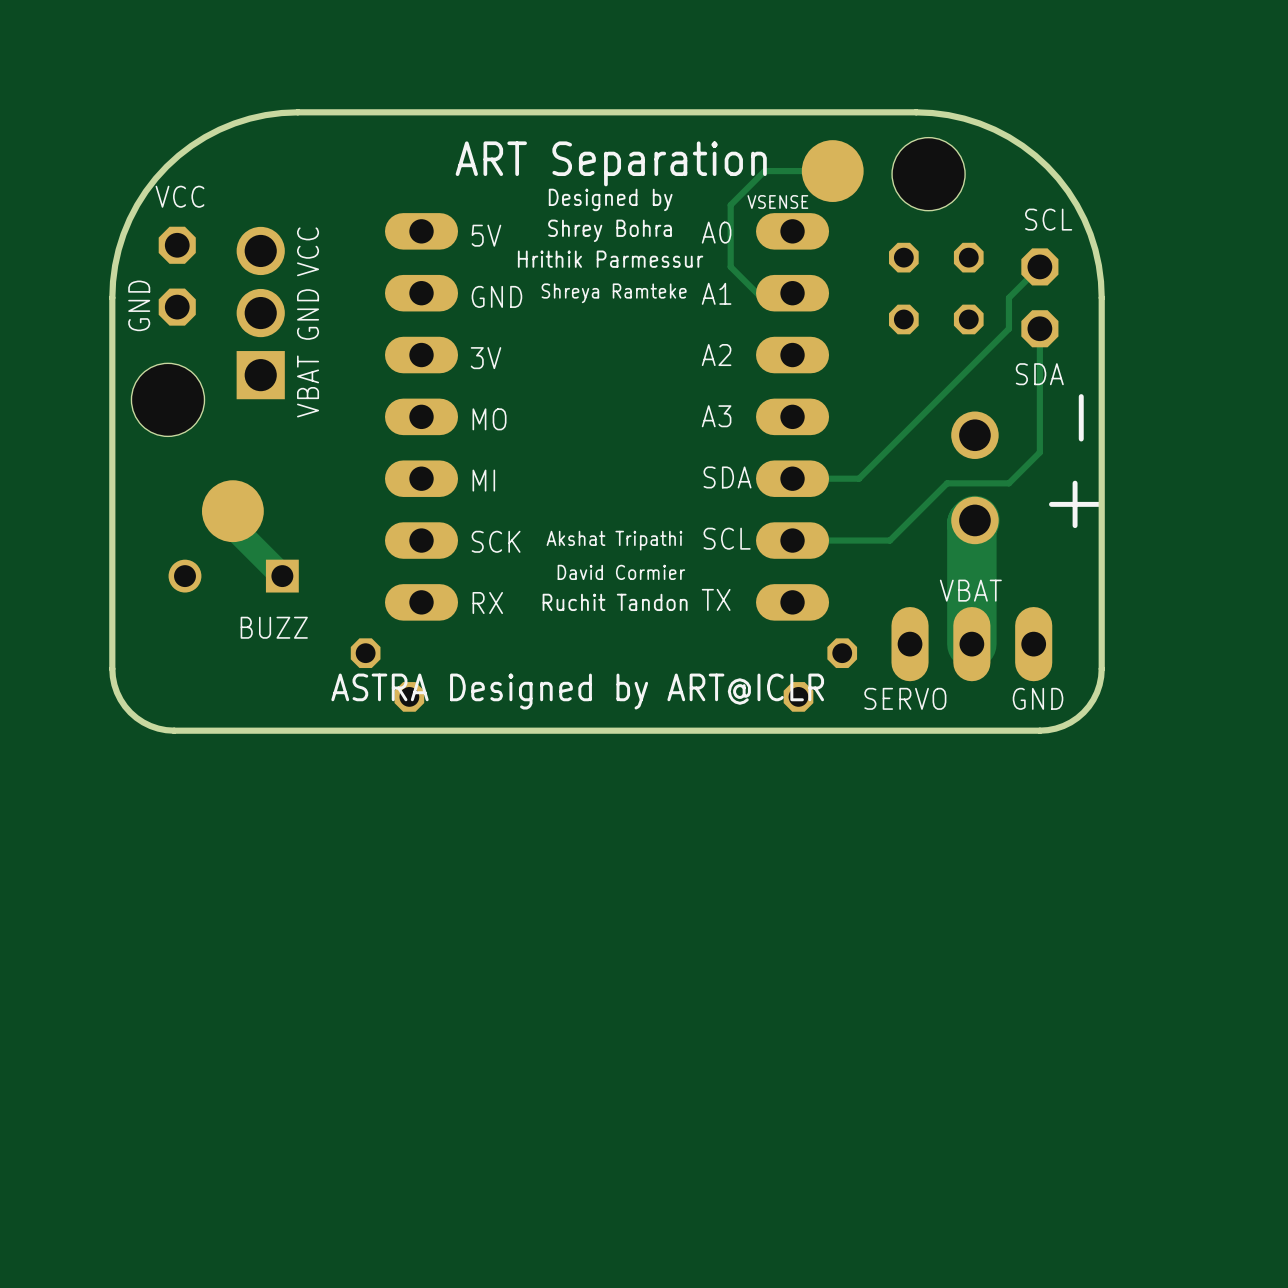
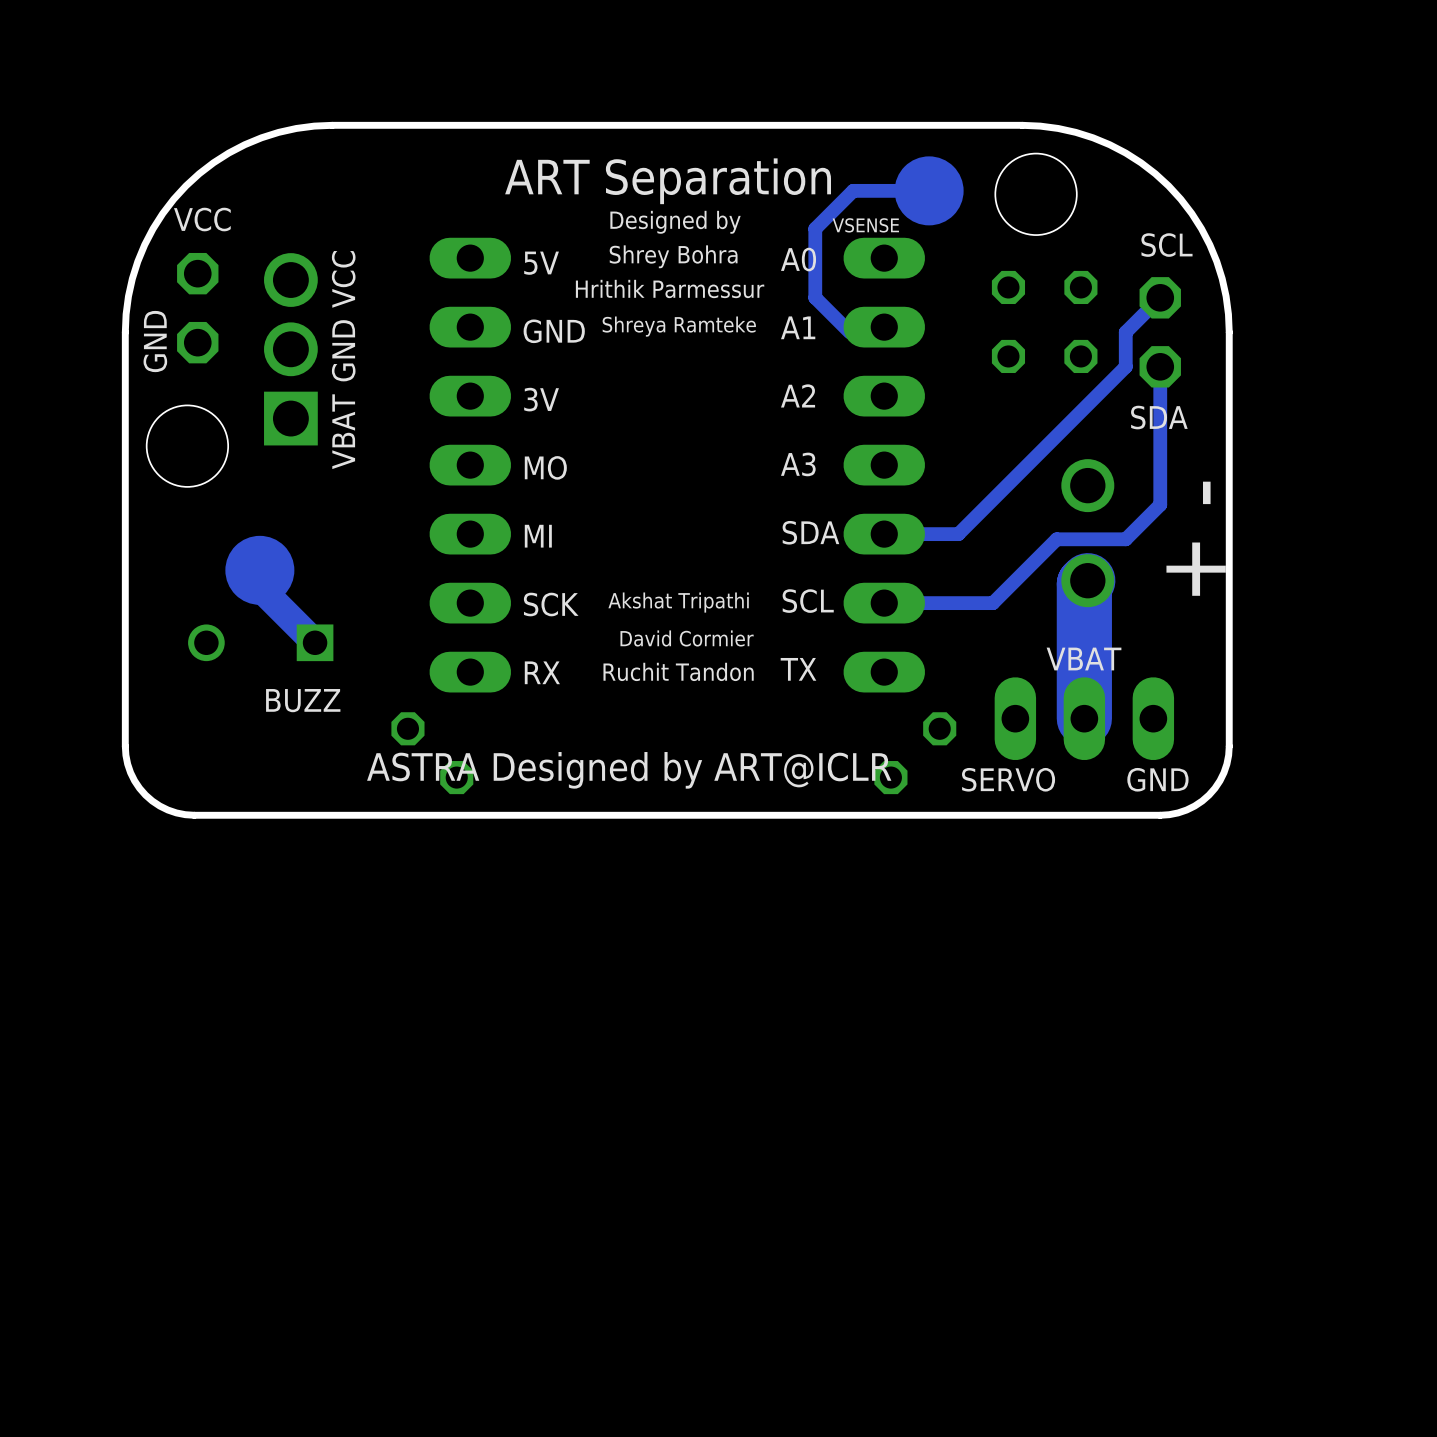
track width: thin (832, 171) (764, 171) (730, 205) (730, 266) (761, 297) -> thick (929, 190) (853, 190) (815, 228) (815, 297) (849, 332)
track width: thin (1039, 266) (1008, 297) (1008, 328) (859, 478) (792, 478) -> thick (1160, 297) (1125, 332) (1125, 366) (958, 534) (884, 534)
track width: thin (1039, 328) (1039, 452) (1008, 483) (947, 483) (889, 540) (792, 540) -> thick (1160, 366) (1160, 504) (1125, 539) (1056, 539) (992, 603) (884, 603)

